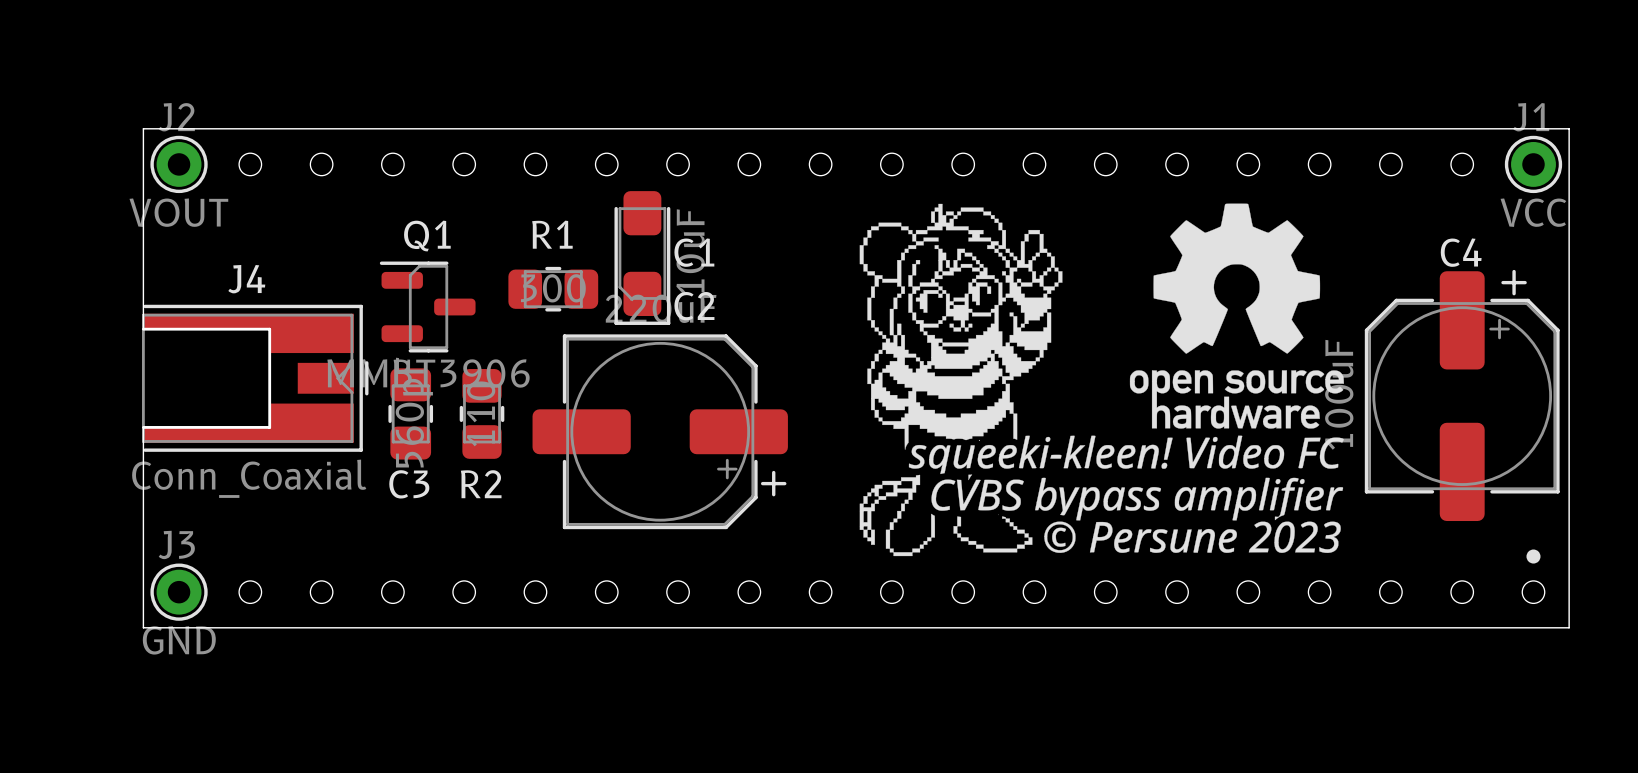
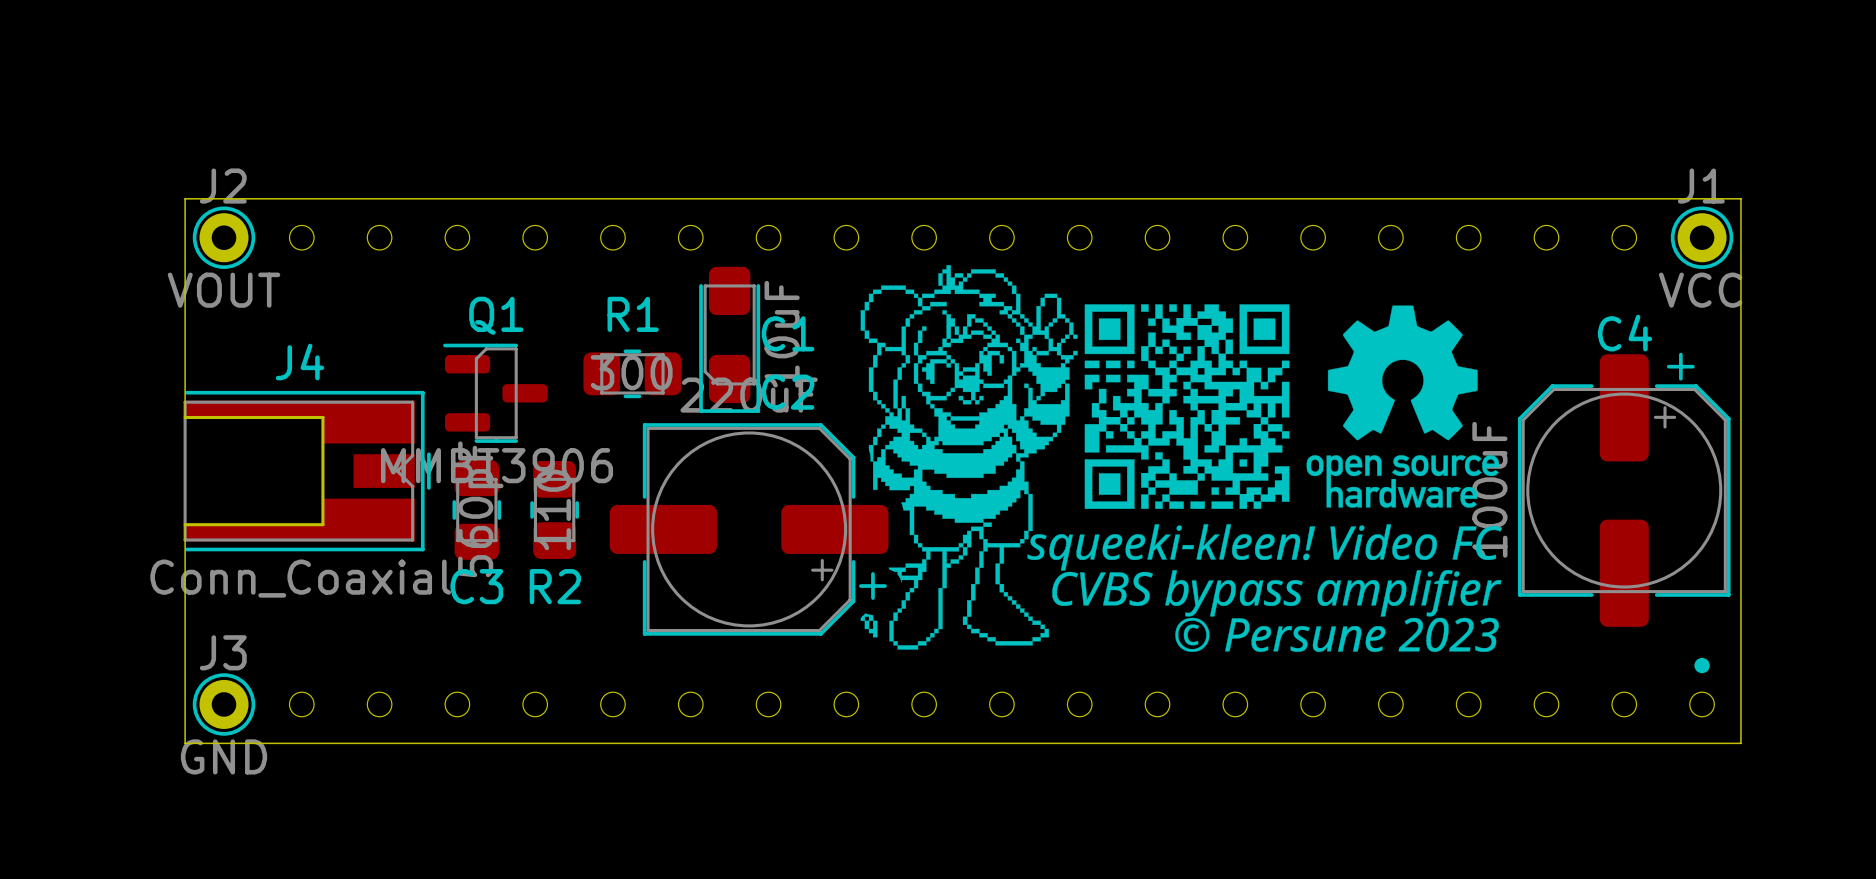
drawing: none -> [860, 265, 1502, 652]
drawing: [859, 203, 1344, 557] -> none

